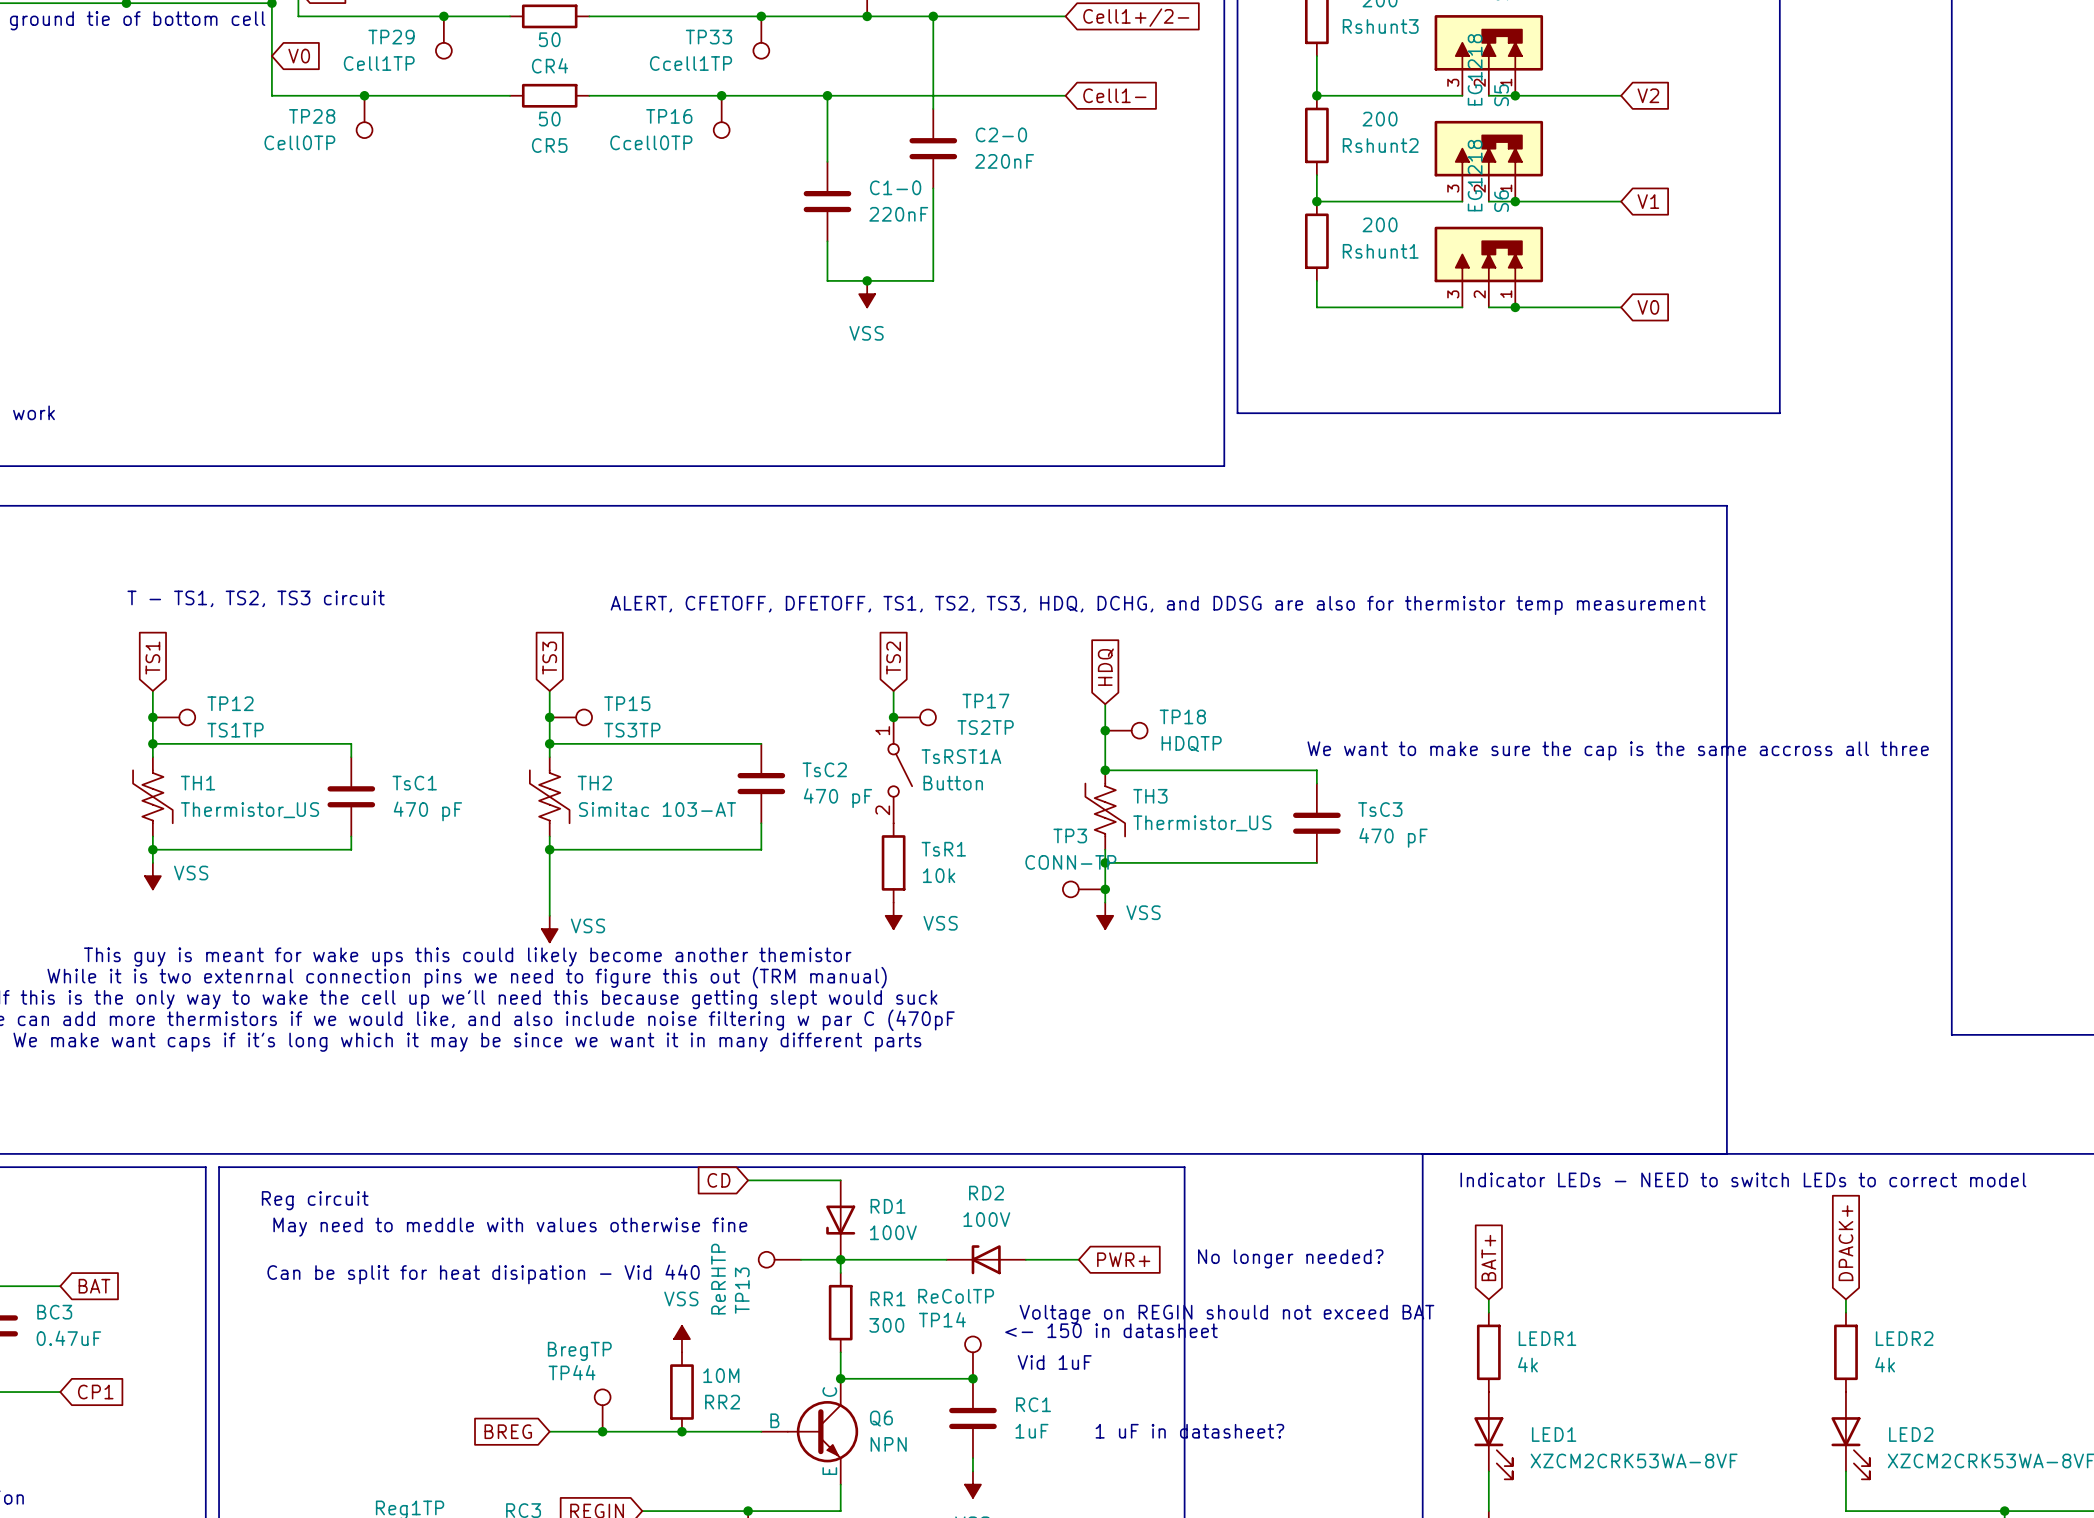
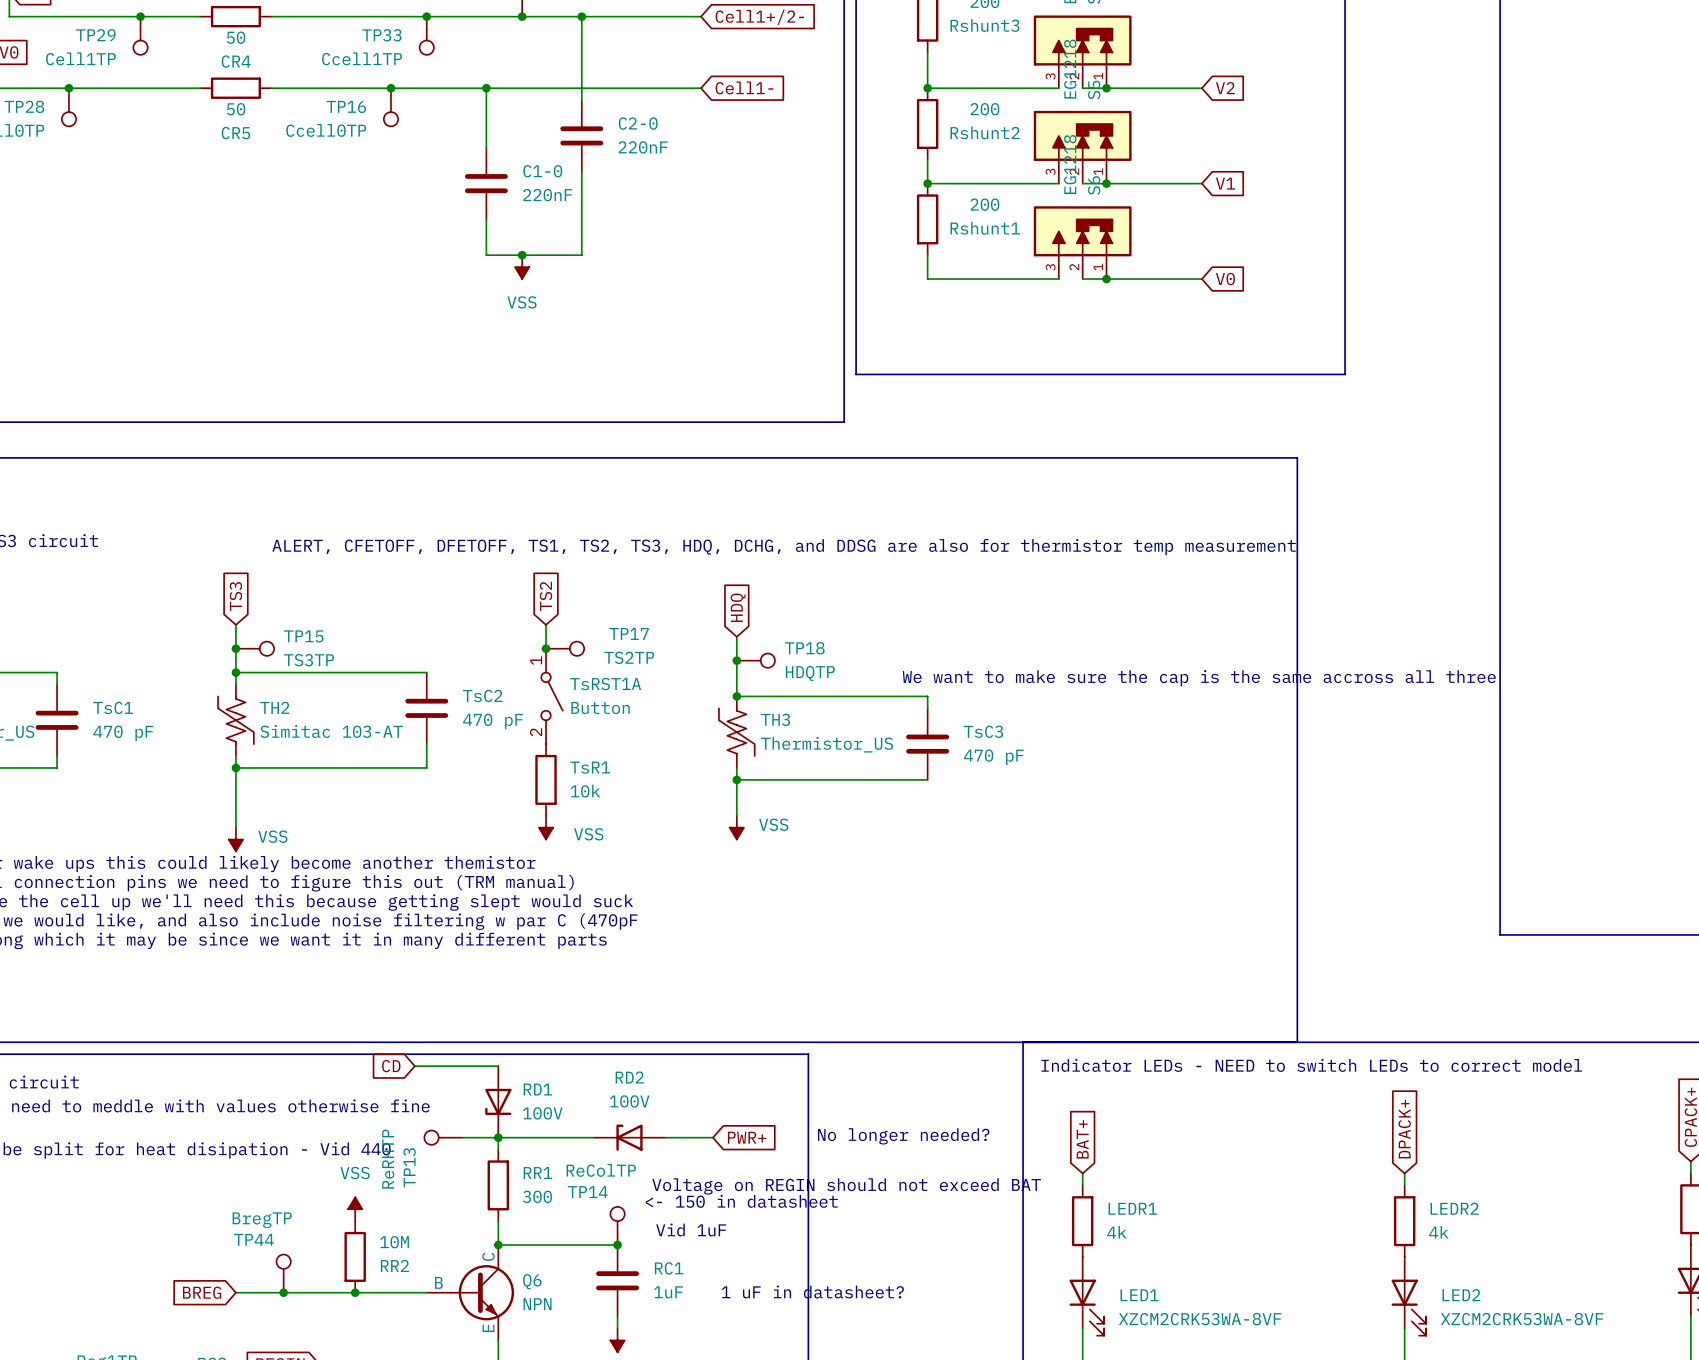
TP3: CONN-TP (1084, 889) -> none
junction: (1105, 889) -> none

